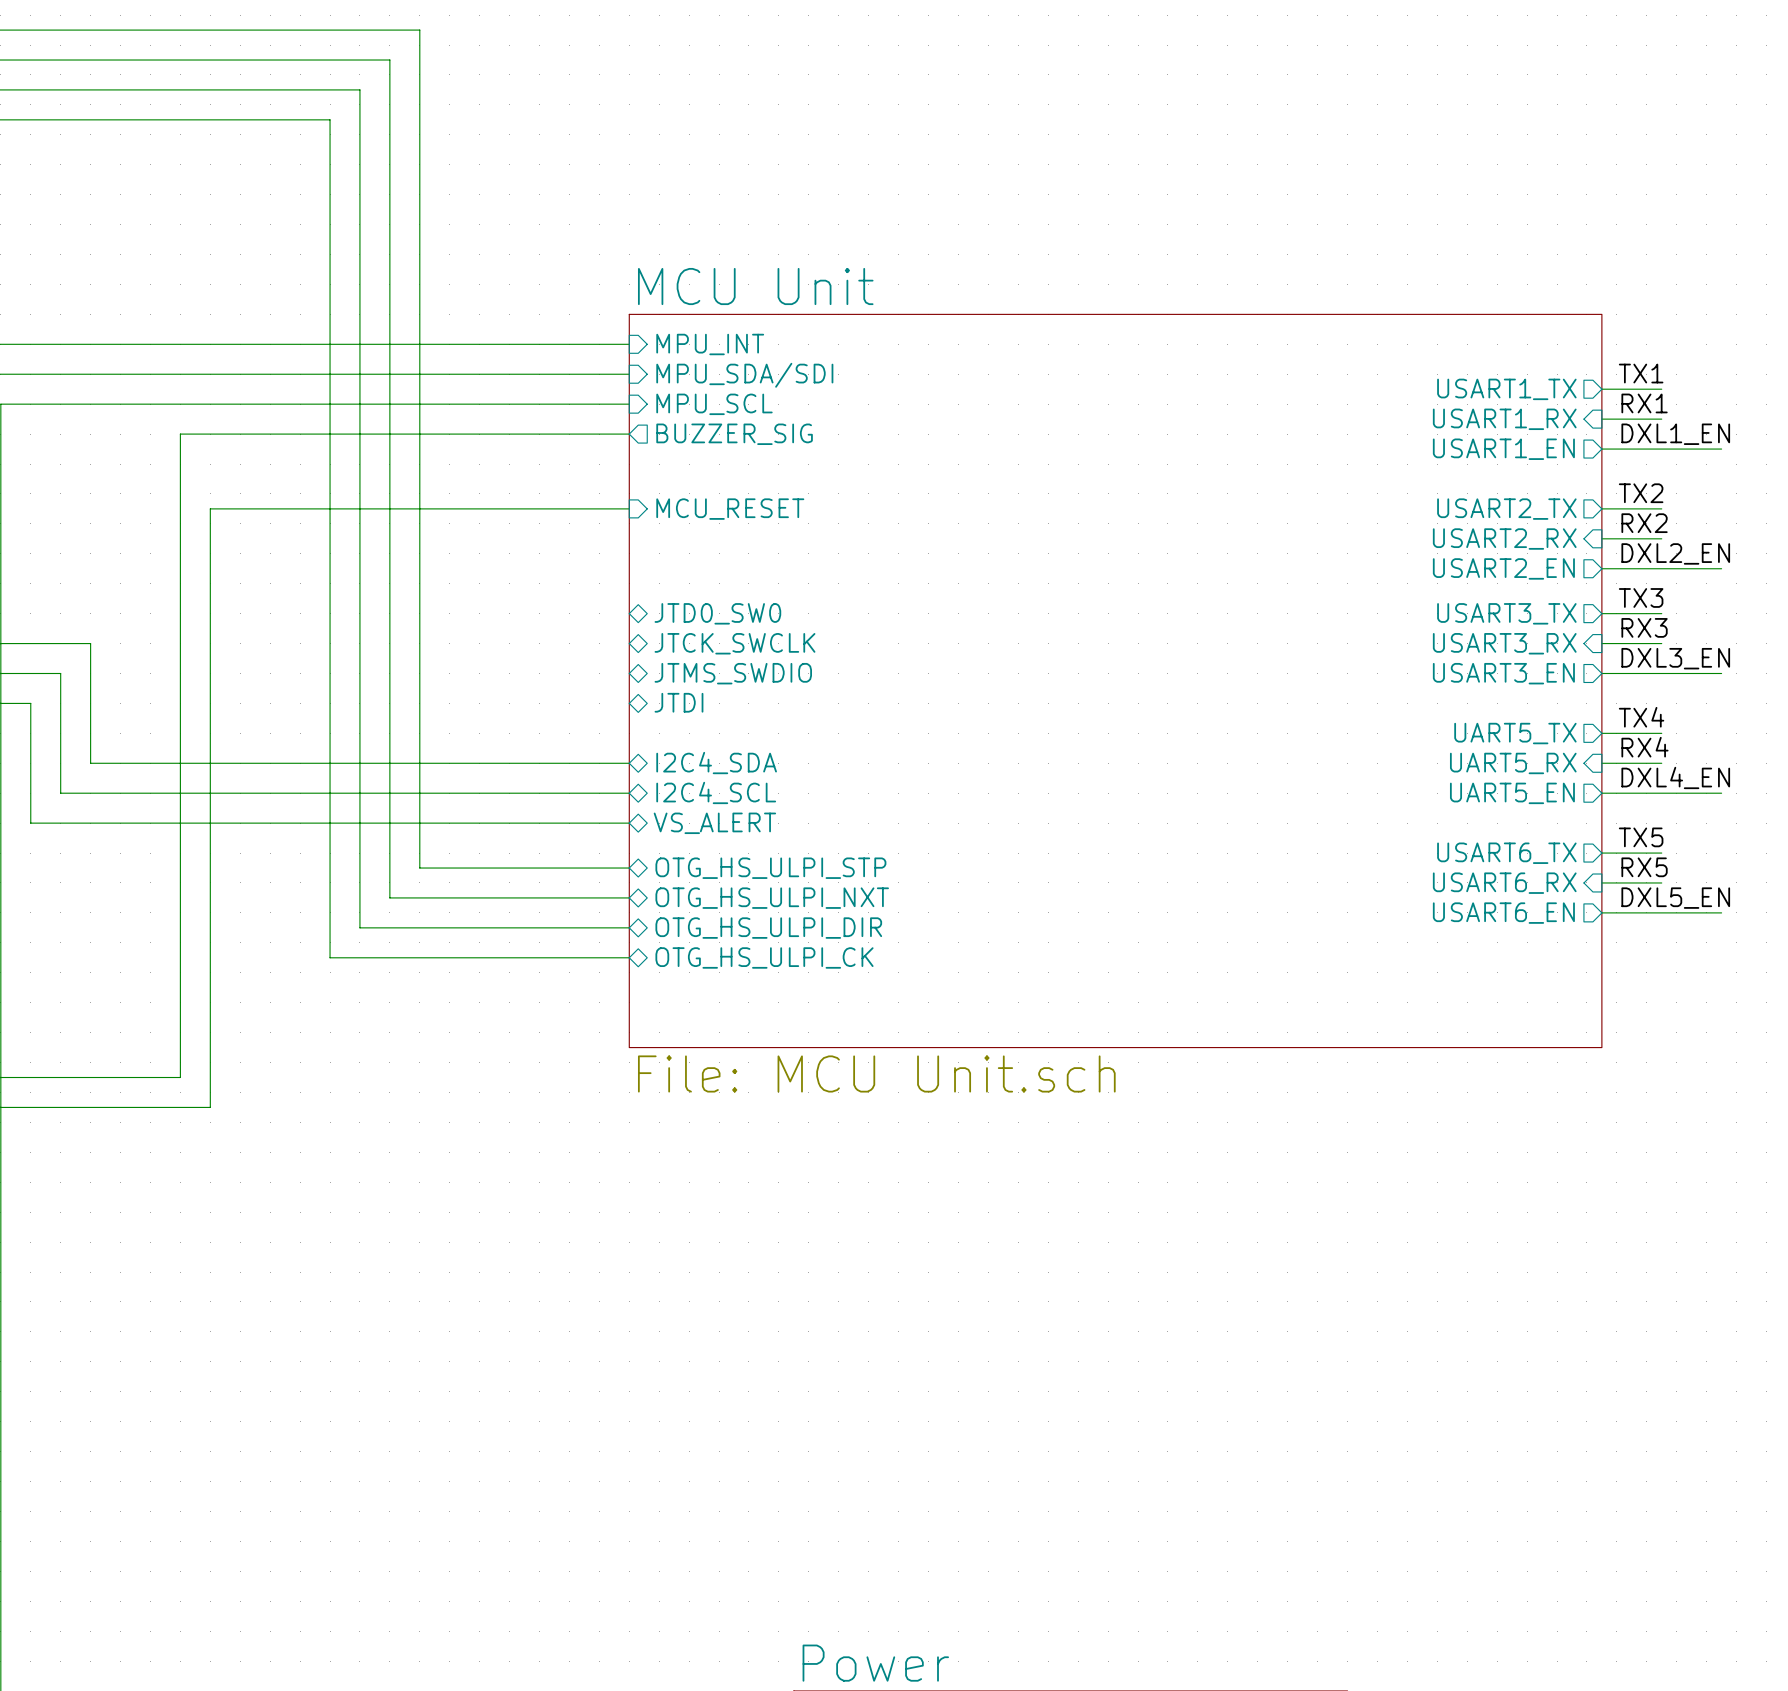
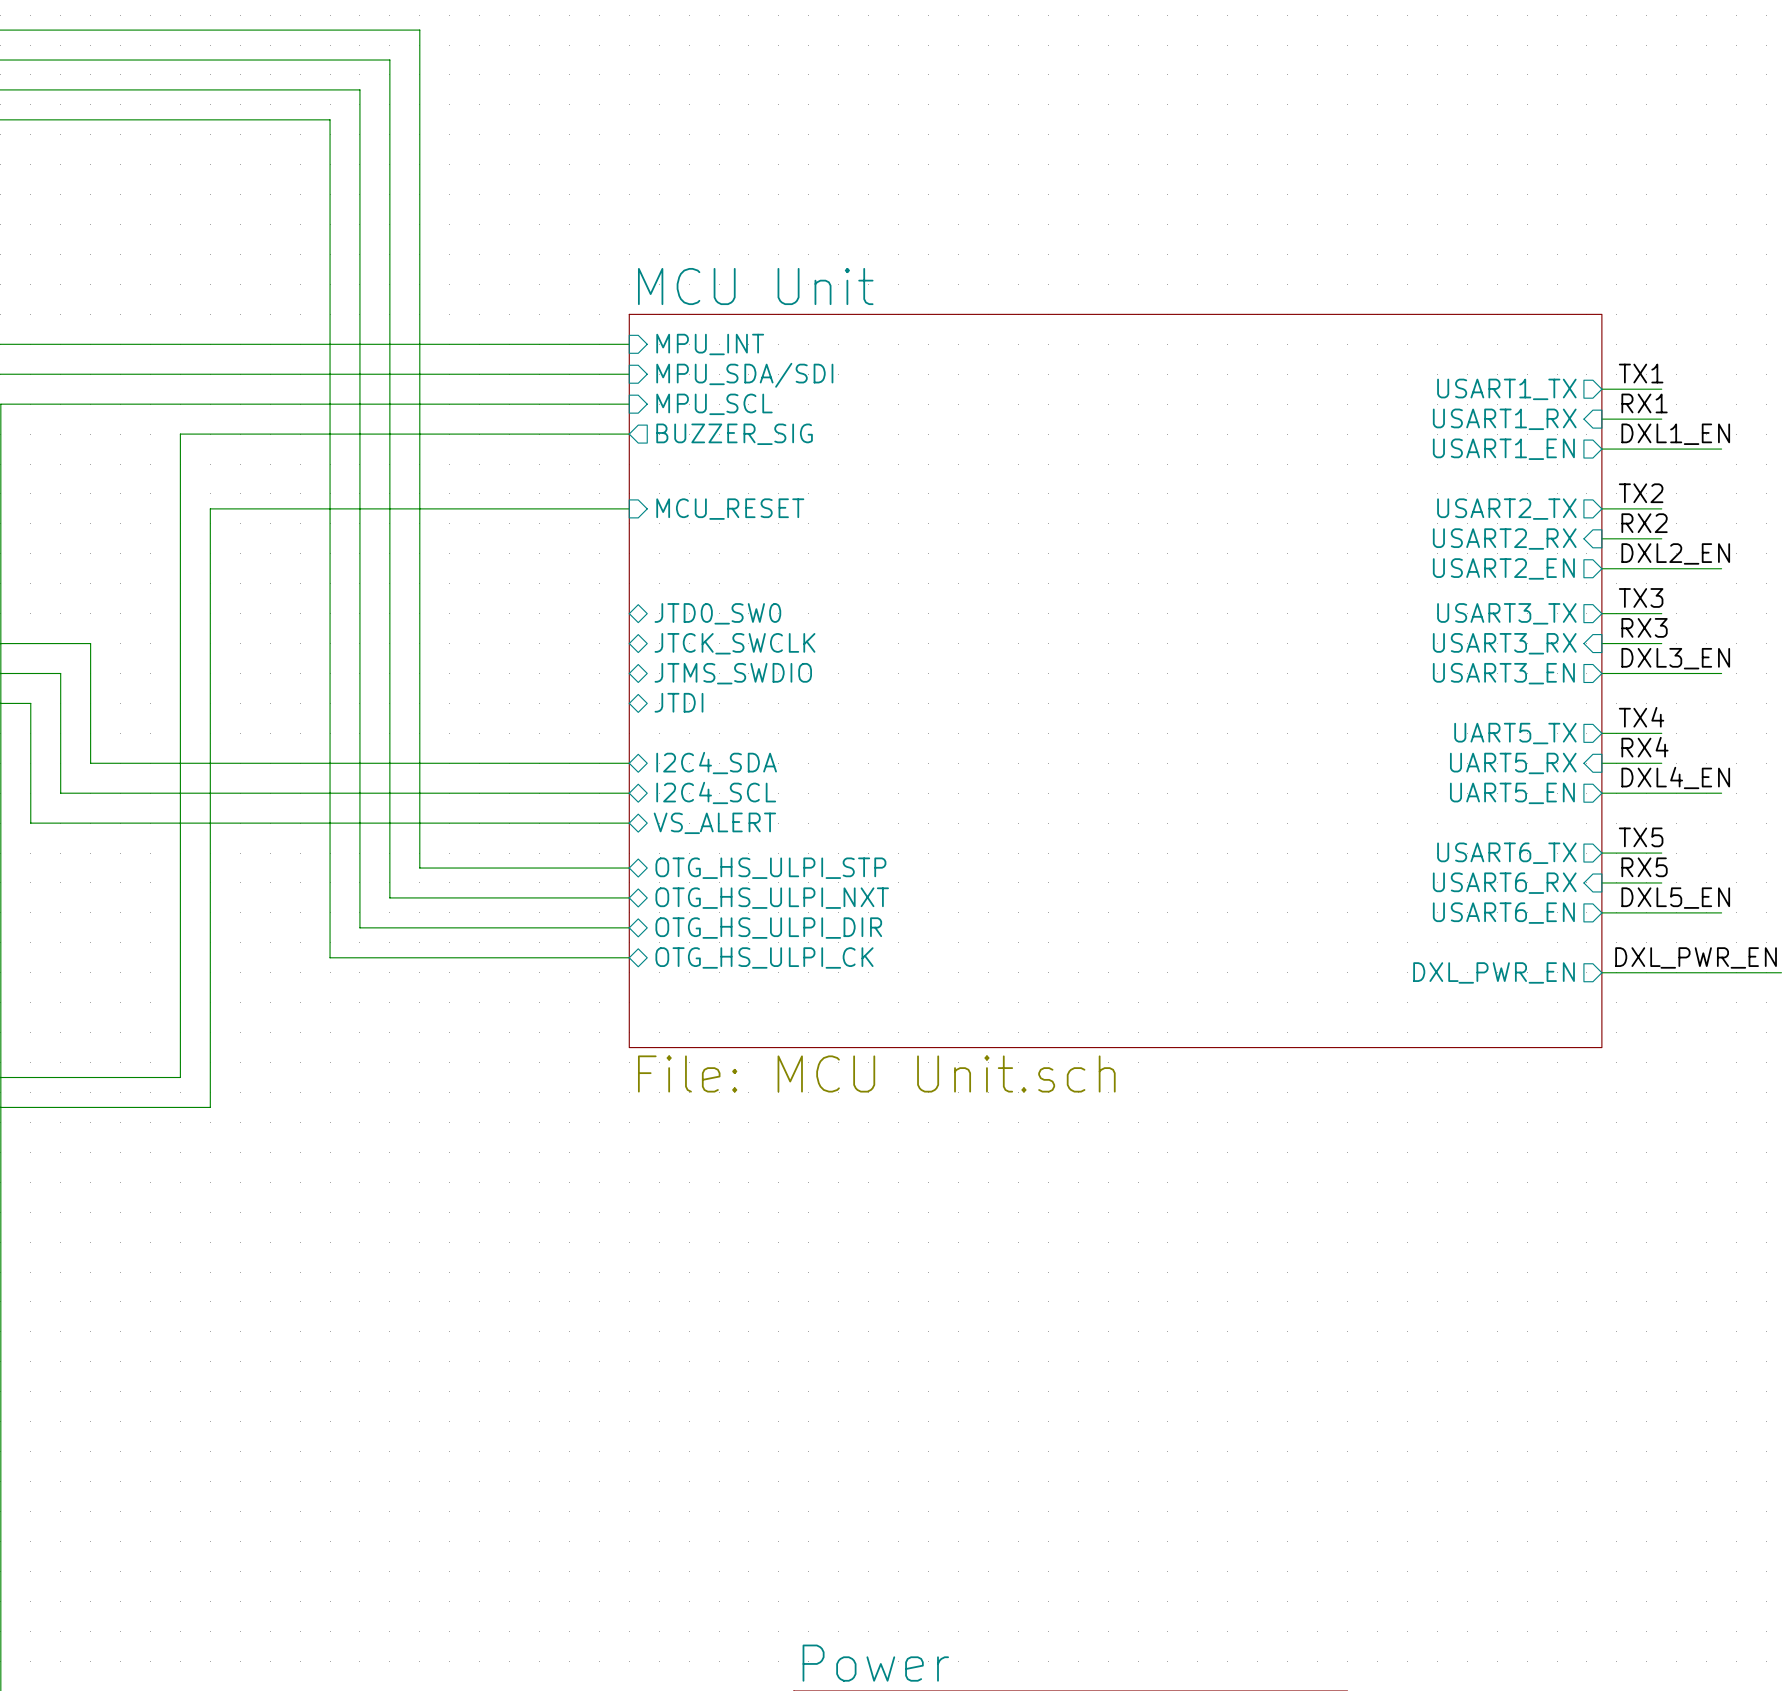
label: none -> DXL_PWR_EN (1696, 957)
sheet pin: none -> DXL_PWR_EN (1494, 972)
wire: none -> (1601, 972) (1781, 972)

